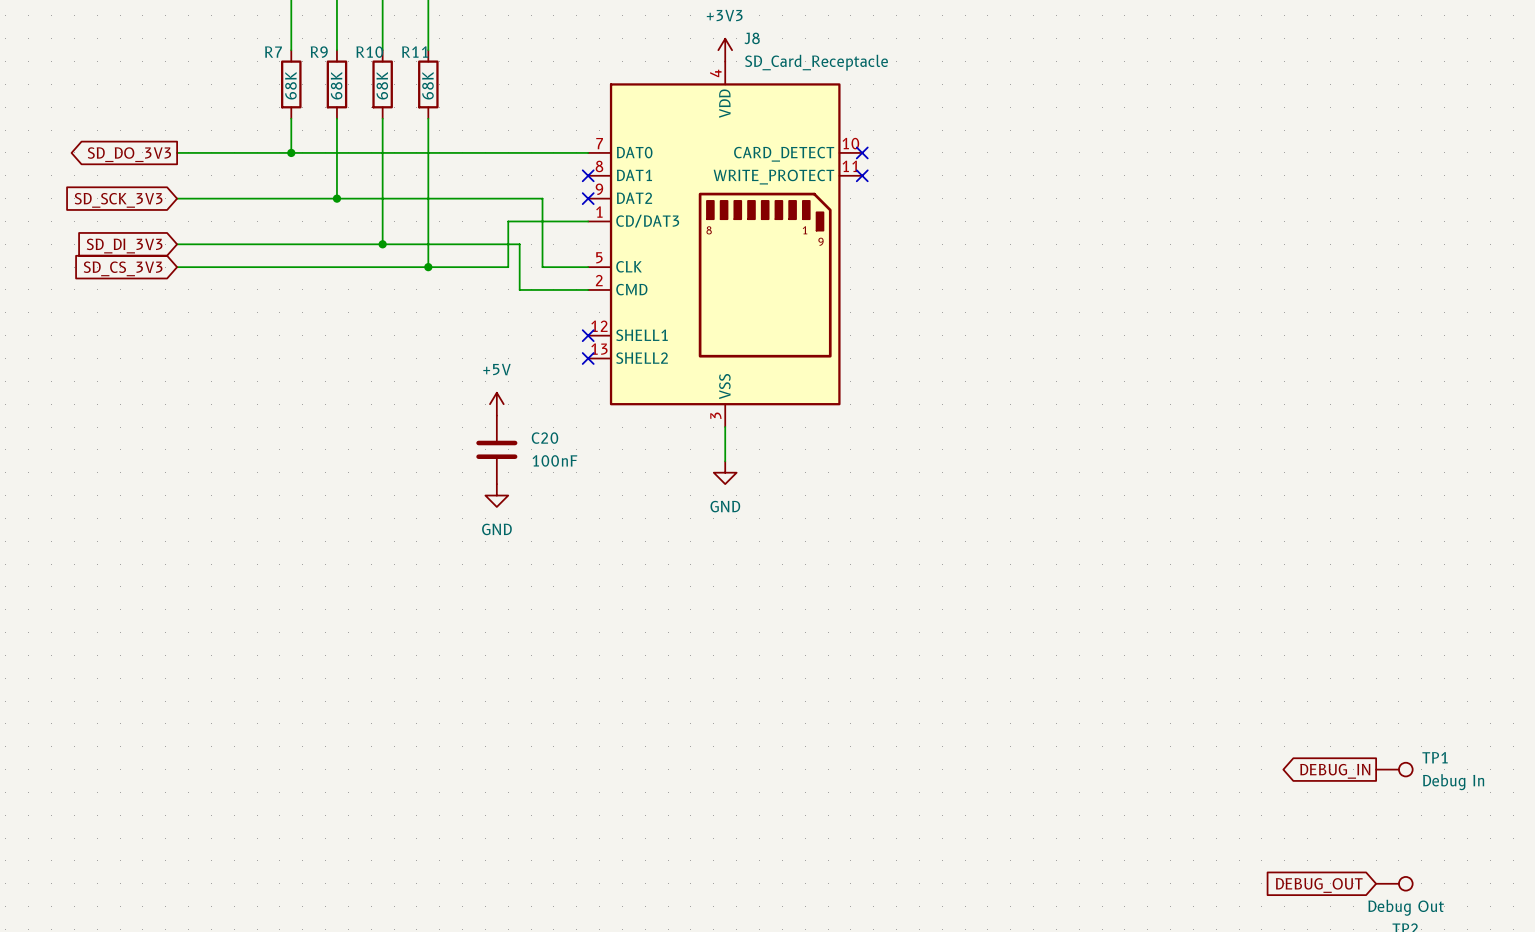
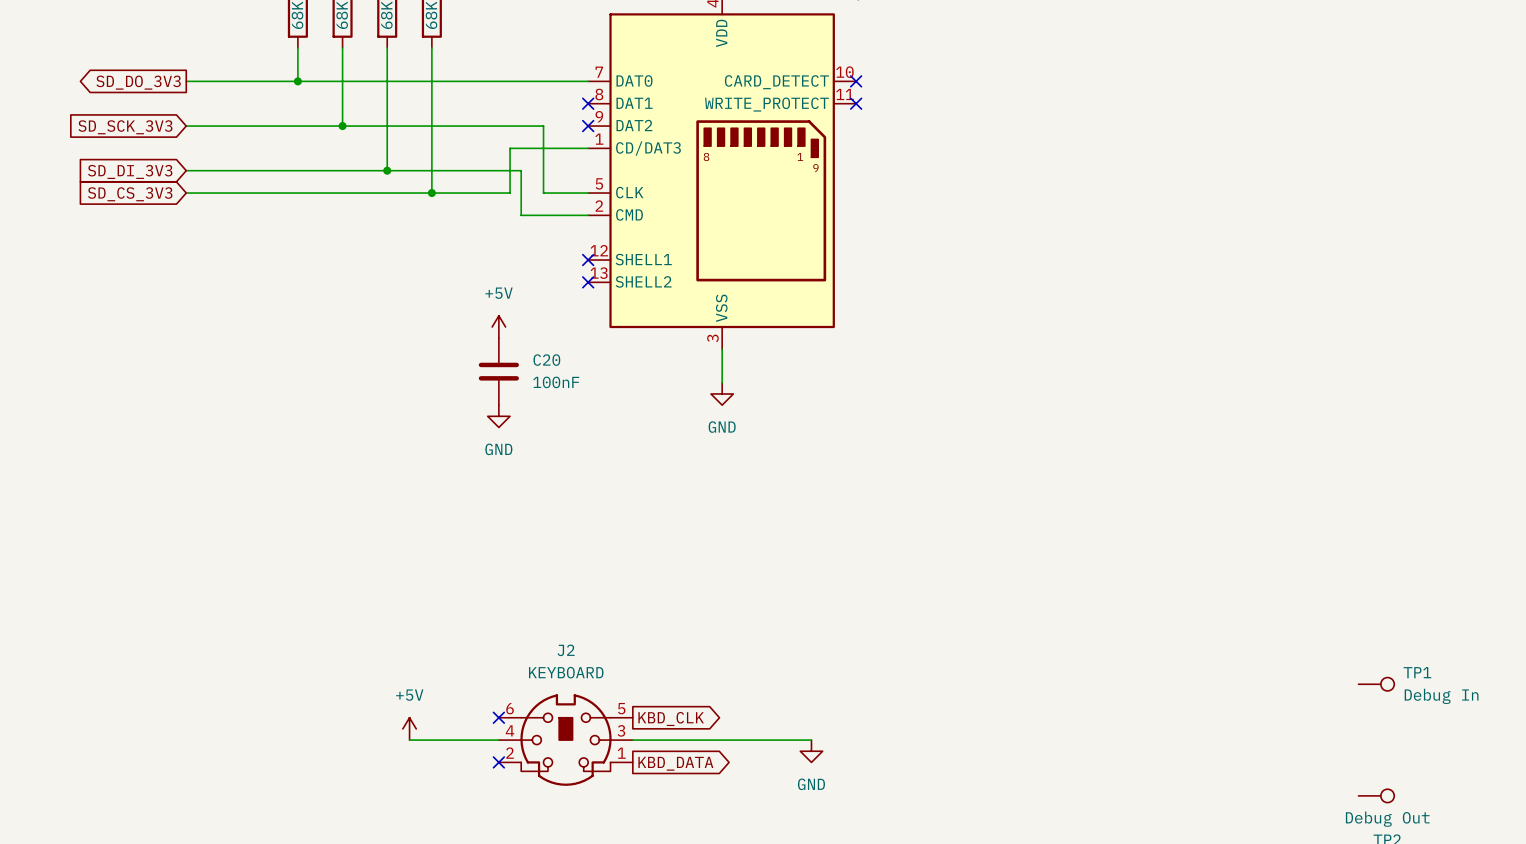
global label: DEBUG_IN (1335, 771) -> none
no-connect mark: none -> (498, 717)
global label: none -> KBD_CLK (671, 719)
power symbol: none -> +5V (409, 728)
wire: none -> (409, 740) (498, 740)
J2: none -> KEYBOARD (565, 740)
wire: none -> (632, 740) (811, 740)
power symbol: none -> GND (811, 751)
no-connect mark: none -> (498, 762)
global label: none -> KBD_DATA (675, 763)
global label: DEBUG_OUT (1319, 885) -> none

